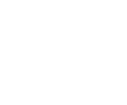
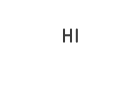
text: none -> HI (70, 35)

